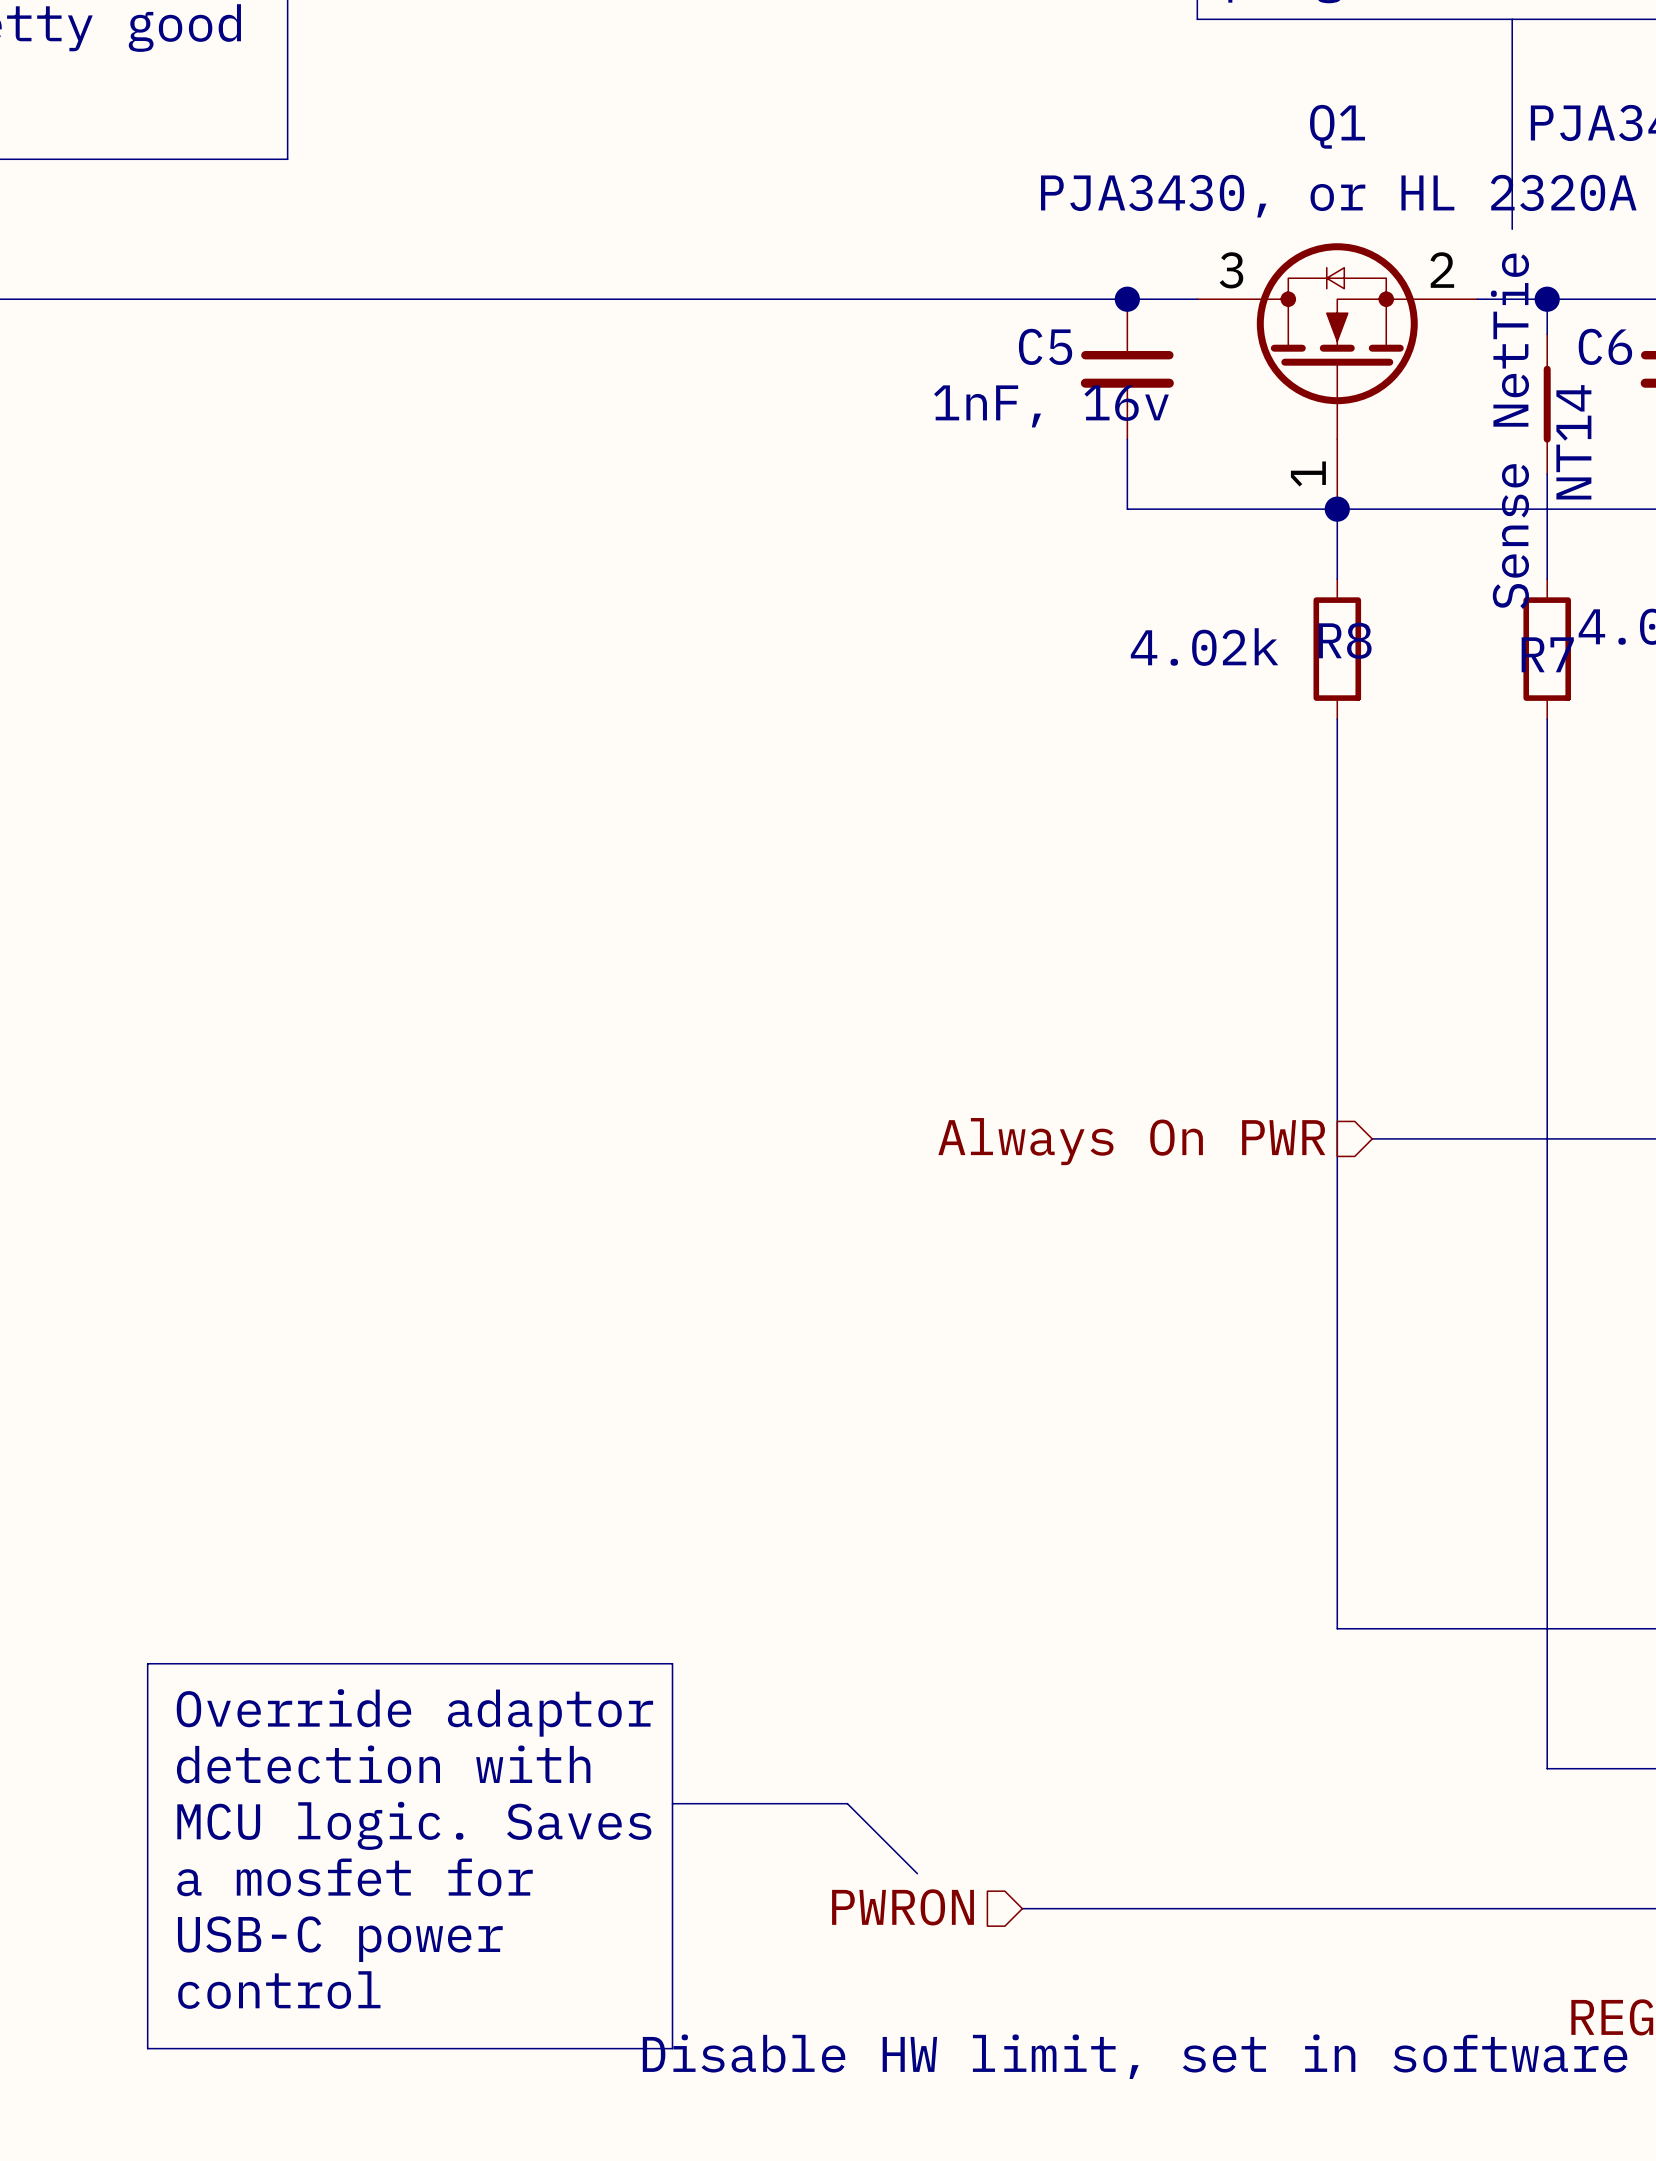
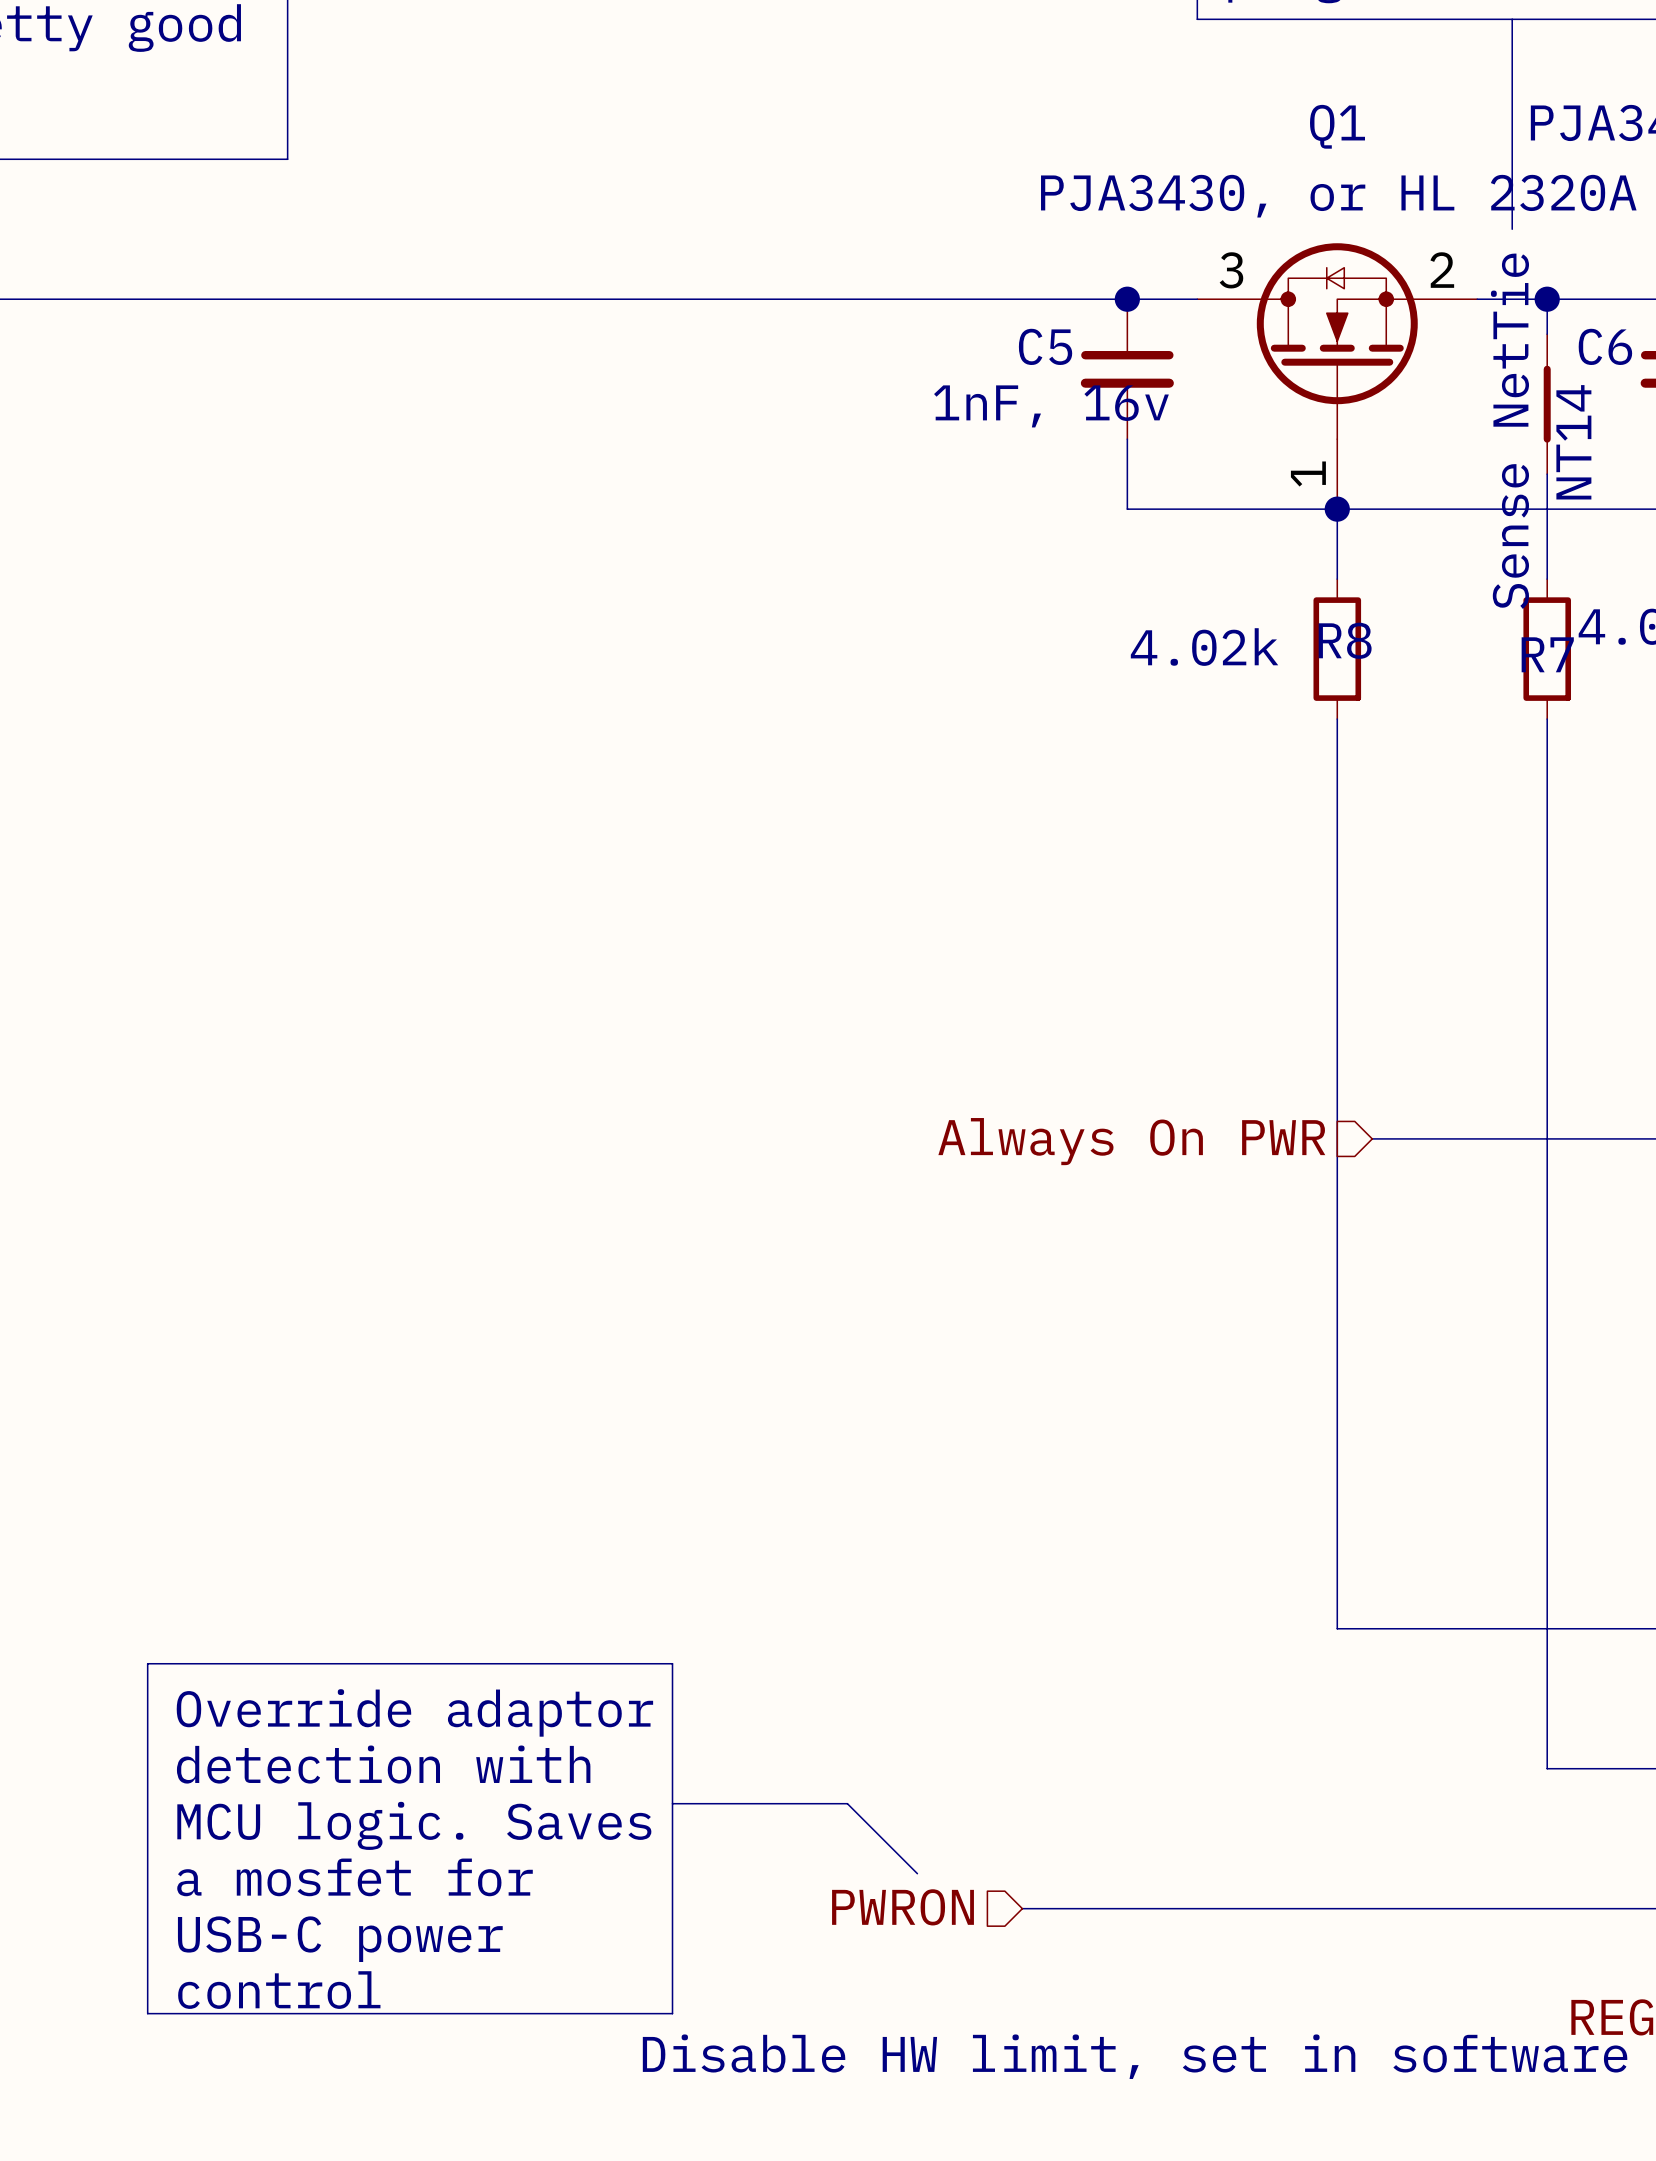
line: (147, 2013) (147, 2048) (672, 2048) (672, 2013) -> (147, 2013) (672, 2013)

